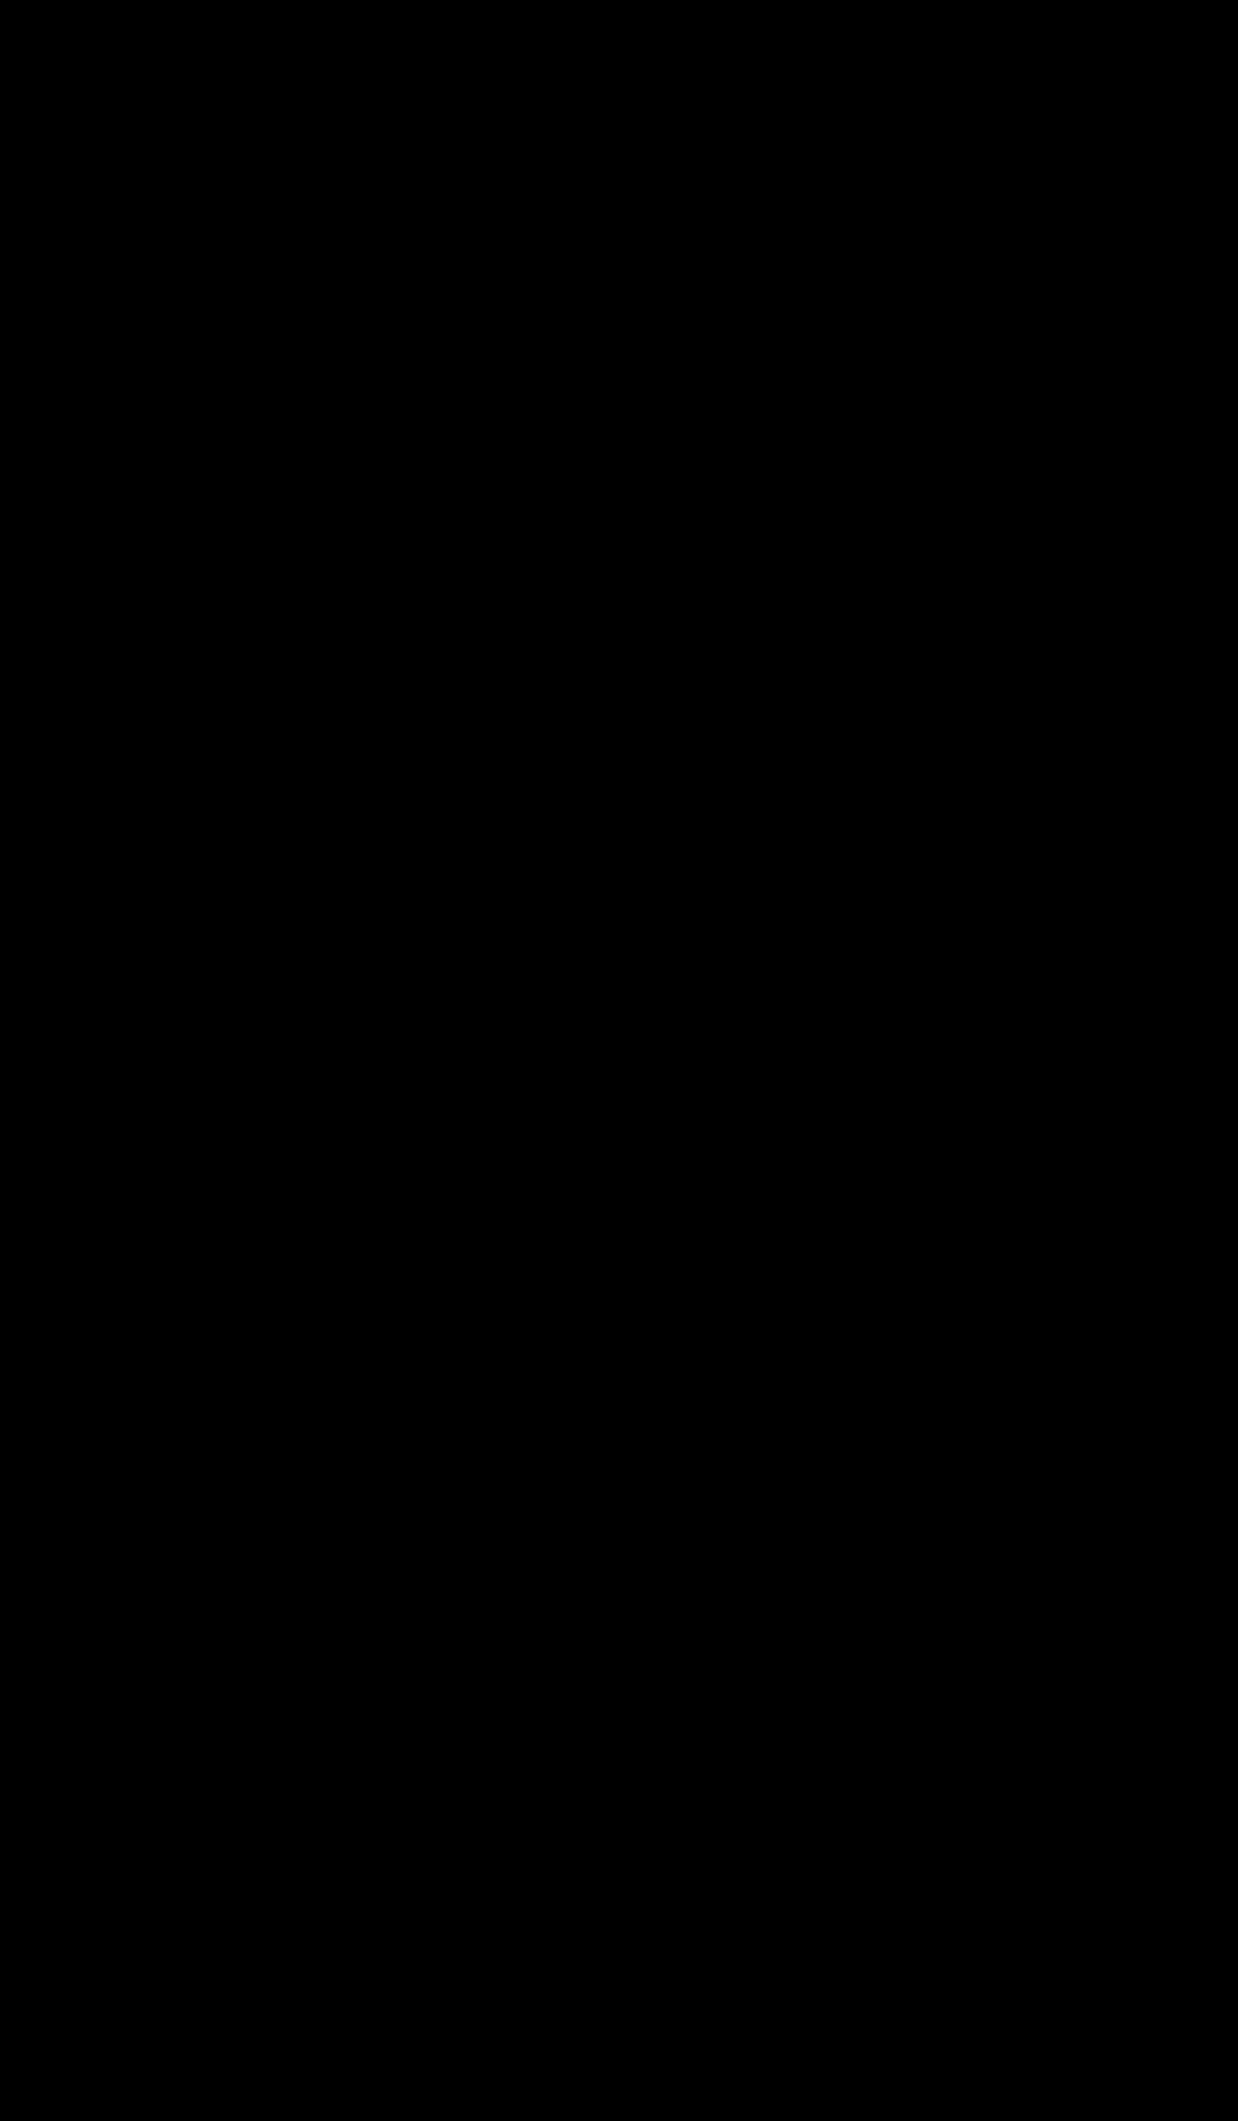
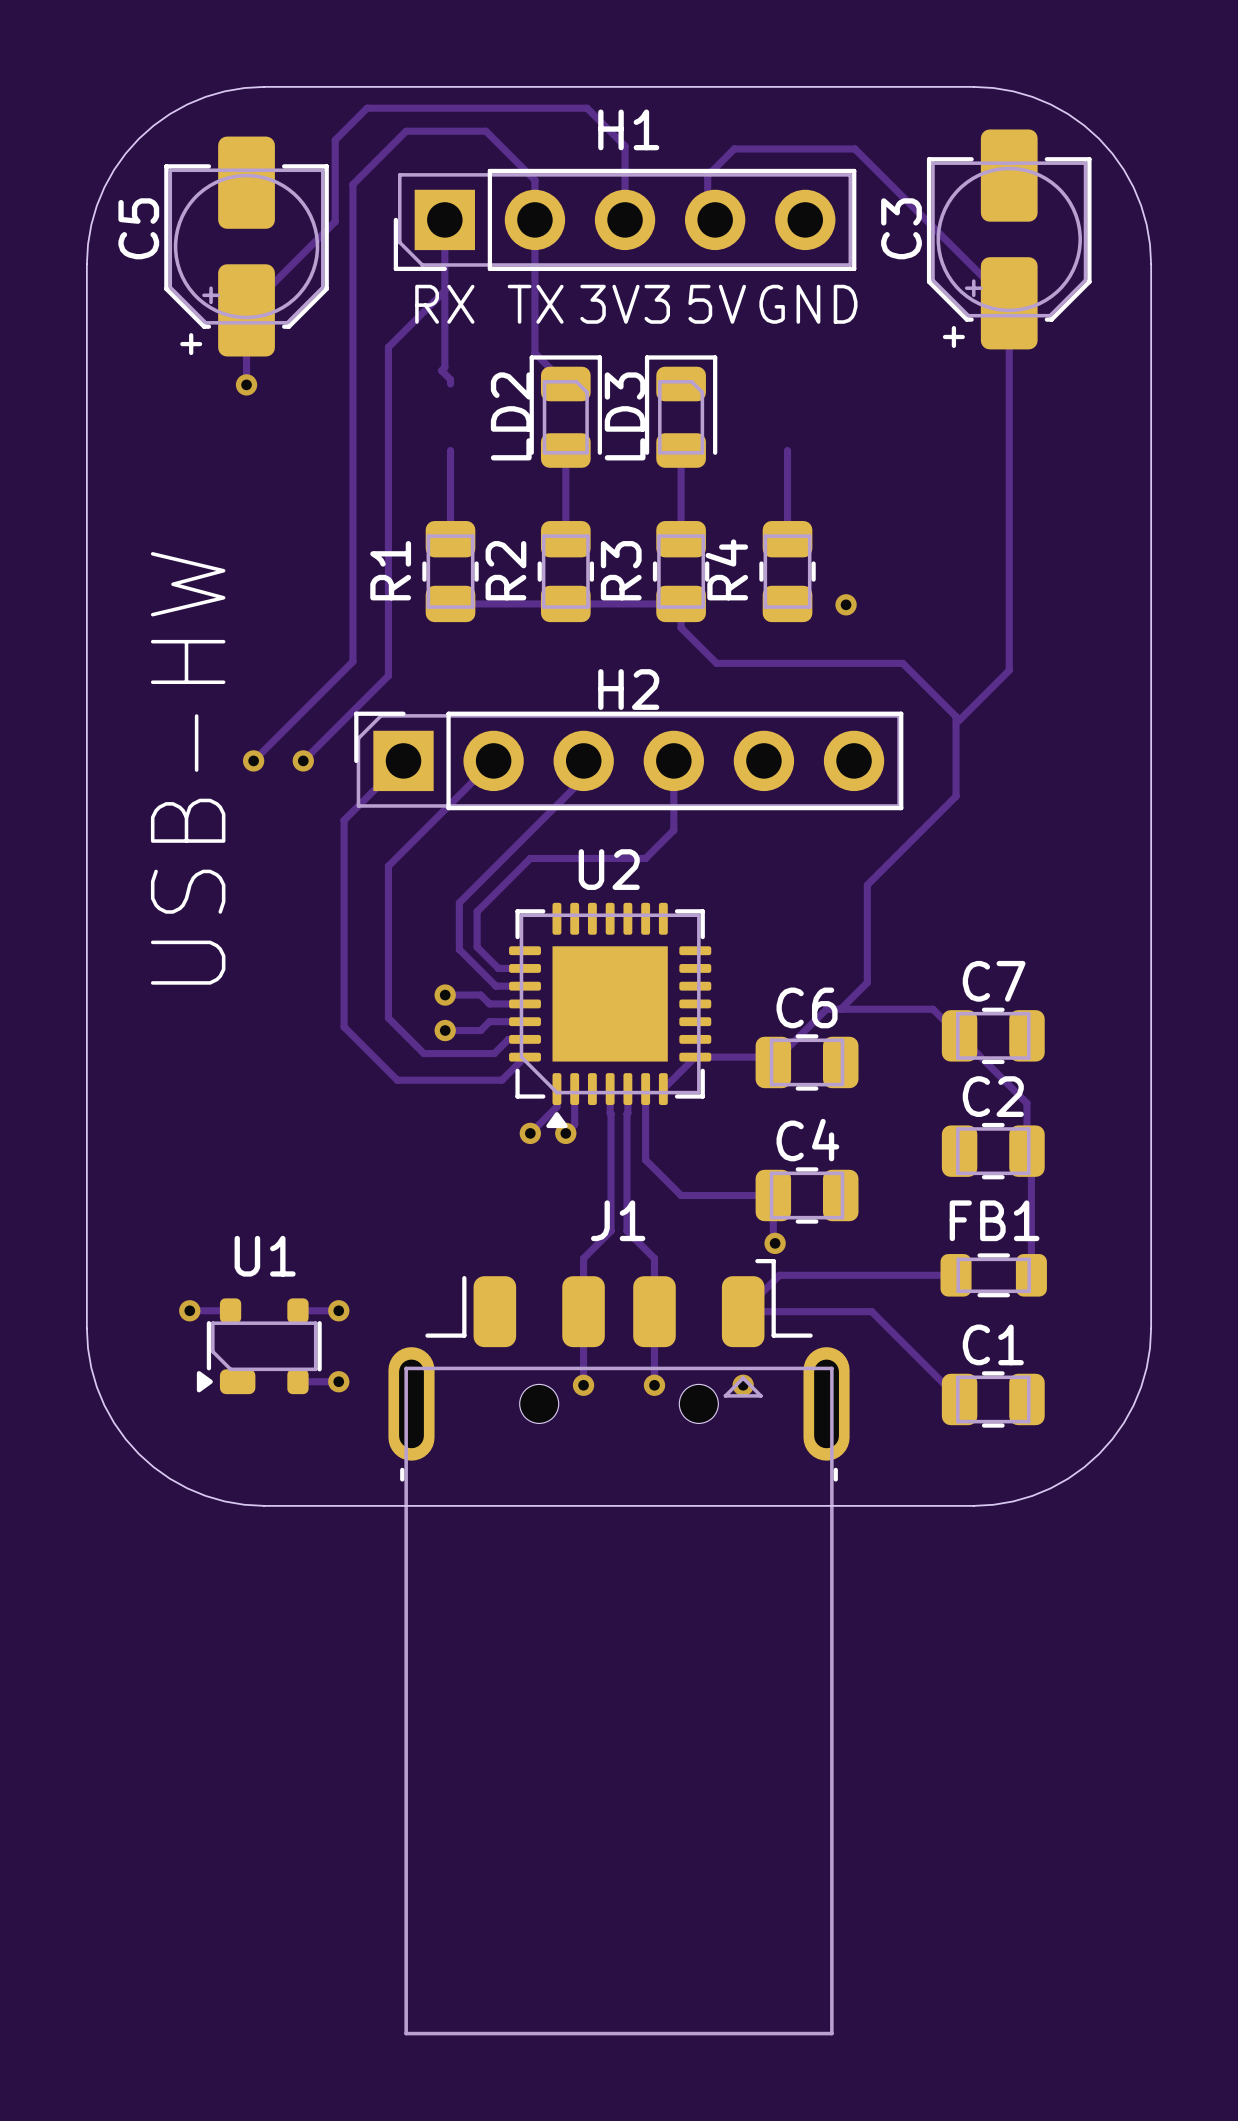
board edge: none -> (264, 86) (993, 88) (1032, 96) (1068, 114) (1099, 138) (1123, 169) (1141, 205) (1146, 224) (1151, 264) (1151, 1328) (1146, 1367) (1141, 1387) (1123, 1422) (1099, 1453) (1068, 1478) (1032, 1495) (1013, 1501) (973, 1505) (244, 1504) (205, 1495) (169, 1478) (138, 1453) (114, 1422) (96, 1387) (91, 1367) (86, 1328) (88, 244) (96, 205) (114, 169) (138, 138) (153, 125) (187, 104) (205, 96) (244, 88) (264, 86)
track: none -> (444, 219) (444, 367) (441, 370) (450, 379) (450, 383)
H1: none -> (625, 219)
track: none -> (636, 219) (625, 219) (625, 146) (587, 108) (367, 108) (335, 140) (335, 221) (246, 310) (246, 384)
track: none -> (715, 219) (715, 200) (707, 193) (707, 175) (734, 148) (854, 148) (1009, 303) (1009, 670) (959, 720) (902, 663) (716, 663) (681, 627) (681, 603) (450, 603)
C3: none -> (1009, 239)
C5: none -> (246, 246)
track: none -> (444, 290) (388, 347) (388, 675) (303, 760)
text: none -> RX (444, 304)
text: none -> TX (535, 304)
text: none -> 3V3 (625, 304)
text: none -> 5V (717, 304)
text: none -> GND (808, 304)
track: none -> (565, 383) (534, 353) (534, 180) (485, 131) (406, 131) (352, 184) (352, 661) (253, 760)
via: none -> (246, 384)
LD2: none -> (565, 411)
LD3: none -> (681, 411)
track: none -> (450, 450) (450, 539)
track: none -> (565, 450) (565, 539)
track: none -> (681, 450) (681, 539)
track: none -> (787, 450) (787, 539)
R1: none -> (450, 571)
R2: none -> (565, 571)
R3: none -> (681, 571)
R4: none -> (787, 571)
via: none -> (846, 604)
track: none -> (956, 716) (956, 796) (867, 885) (867, 982) (840, 1009)
via: none -> (253, 760)
via: none -> (303, 760)
track: none -> (403, 760) (344, 820) (344, 1026) (397, 1080) (501, 1080) (525, 1057)
track: none -> (493, 760) (388, 866) (388, 1018) (423, 1053) (494, 1053) (508, 1039) (525, 1039)
track: none -> (583, 760) (583, 778) (459, 902) (459, 949) (496, 986) (525, 986)
H2: none -> (628, 760)
track: none -> (673, 760) (673, 830) (645, 858) (530, 858) (477, 911) (477, 947) (498, 968) (525, 968)
text: none -> USB-HW (188, 768)
track: none -> (445, 995) (480, 995) (489, 1003) (525, 1003)
via: none -> (445, 995)
U2: none -> (610, 1015)
track: none -> (525, 1021) (489, 1021) (480, 1030) (445, 1030)
via: none -> (445, 1030)
C7: none -> (993, 1035)
C6: none -> (807, 1062)
track: none -> (556, 1089) (556, 1106) (530, 1133)
track: none -> (574, 1089) (574, 1124) (565, 1133)
track: none -> (610, 1089) (611, 1230) (583, 1258) (583, 1385)
track: none -> (627, 1089) (627, 1230) (654, 1258) (654, 1385)
track: none -> (645, 1089) (645, 1160) (681, 1195) (773, 1195) (773, 1241) (775, 1243)
track: none -> (663, 1089) (695, 1057) (768, 1057) (773, 1062) (826, 1009) (932, 1009) (1026, 1103) (1026, 1151) (1031, 1155) (1031, 1275)
via: none -> (530, 1133)
via: none -> (565, 1133)
C2: none -> (993, 1151)
C4: none -> (807, 1195)
via: none -> (775, 1243)
track: none -> (956, 1275) (779, 1275) (743, 1311) (871, 1311) (959, 1399)
FB1: none -> (993, 1275)
track: none -> (189, 1310) (230, 1310)
via: none -> (189, 1310)
track: none -> (297, 1310) (338, 1310)
via: none -> (338, 1310)
U1: none -> (259, 1346)
track: none -> (297, 1381) (338, 1381)
via: none -> (338, 1381)
via: none -> (583, 1385)
via: none -> (654, 1385)
via: none -> (743, 1385)
C1: none -> (993, 1399)
J1: none -> (619, 1647)

